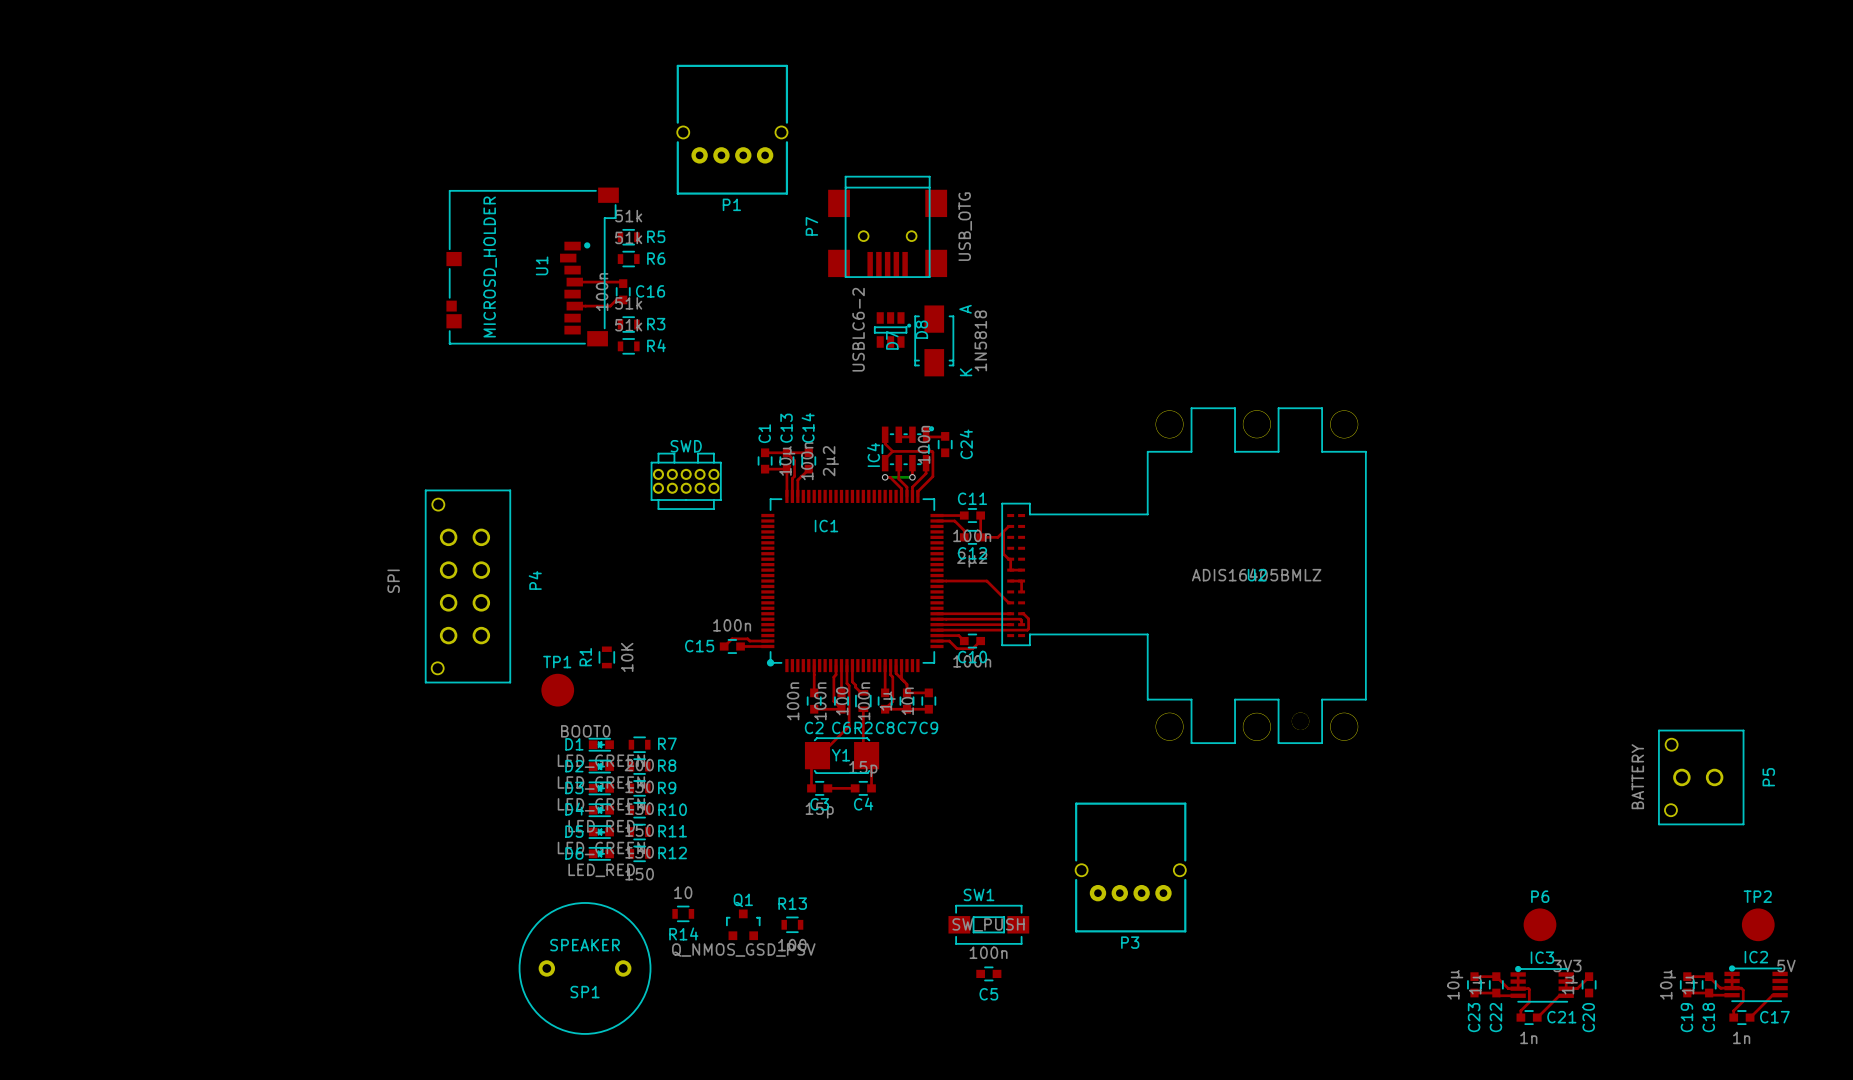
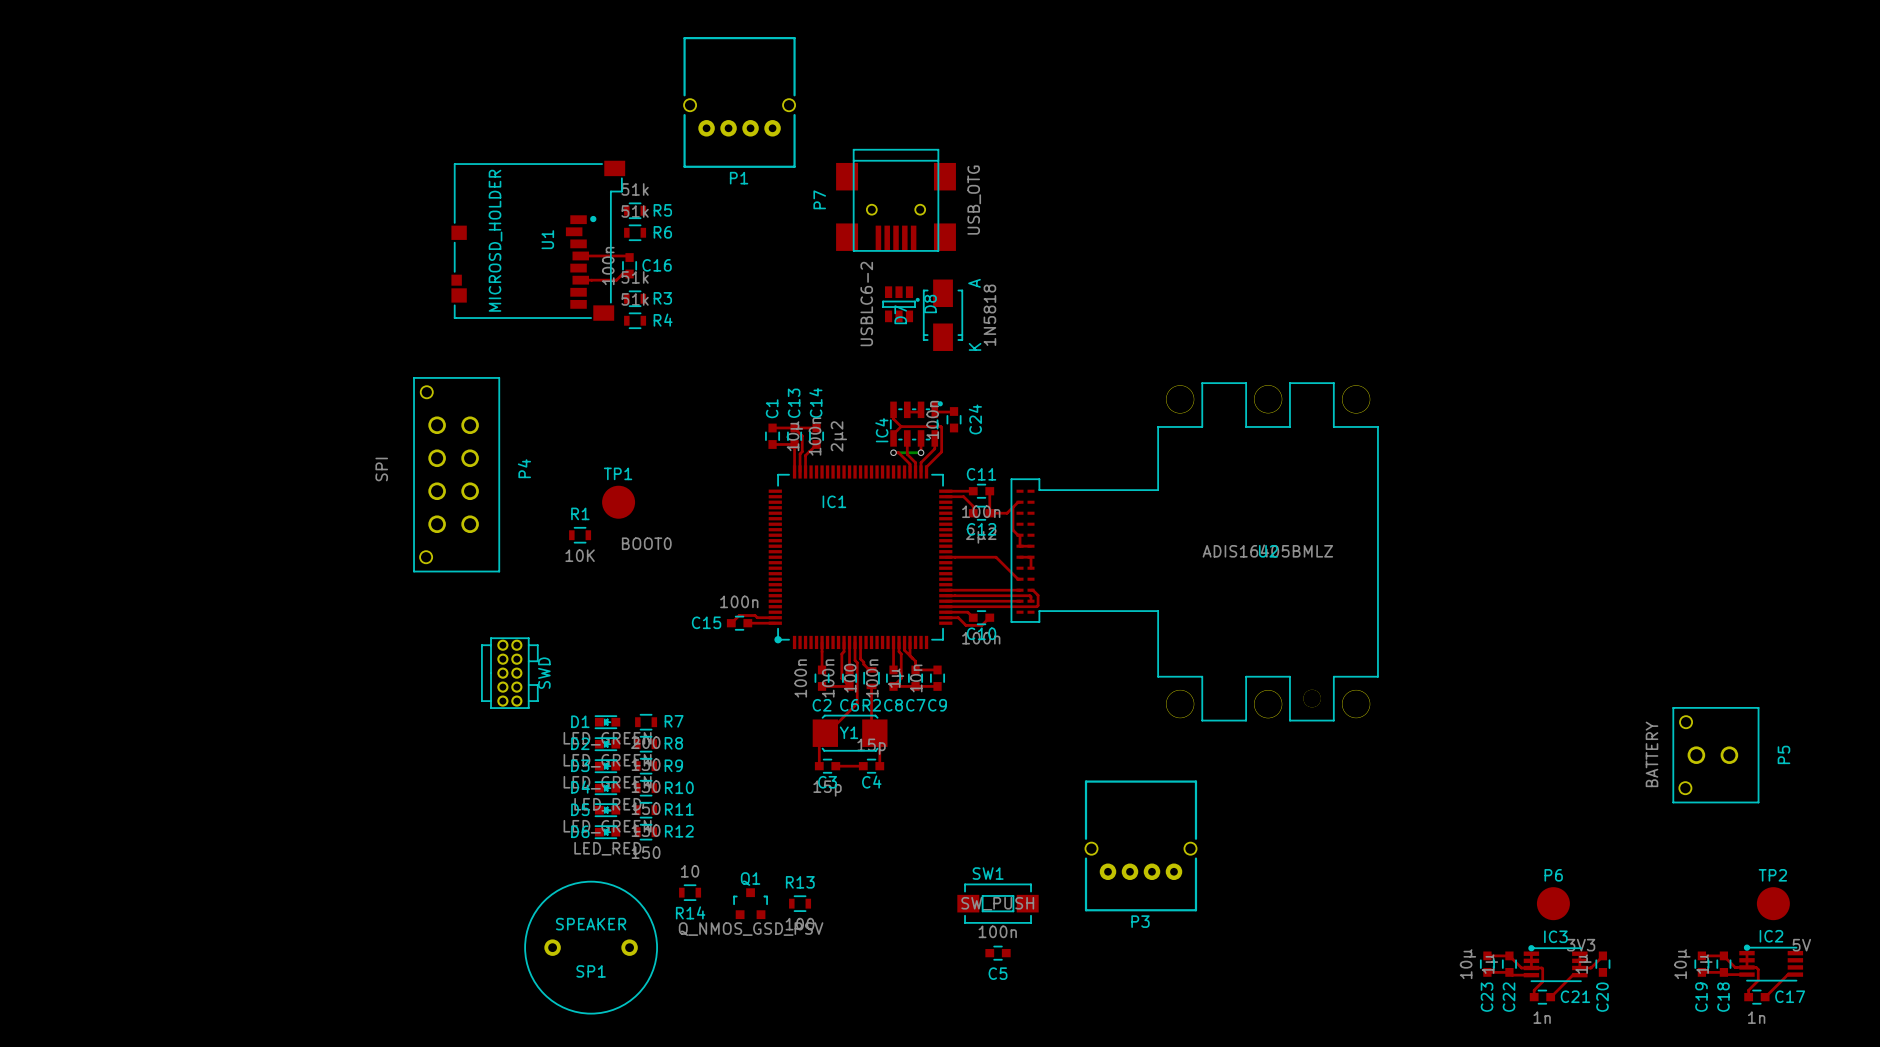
part: SWD (686, 481) -> none
P4 position: (467, 586) -> (456, 474)
R1 rotation: 0° (606, 657) -> 90° clockwise (580, 535)
R1 position: (606, 657) -> (580, 535)
TP1 position: (557, 690) -> (618, 502)
part: none -> SWD (509, 673)

